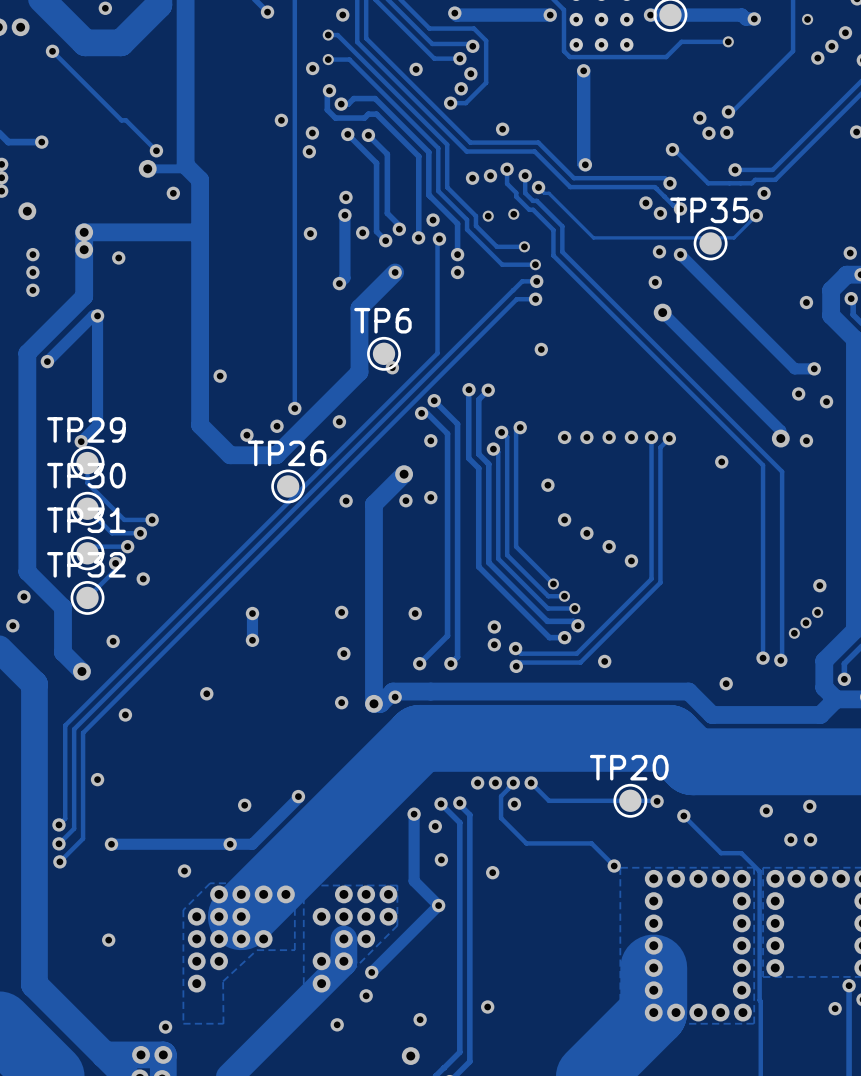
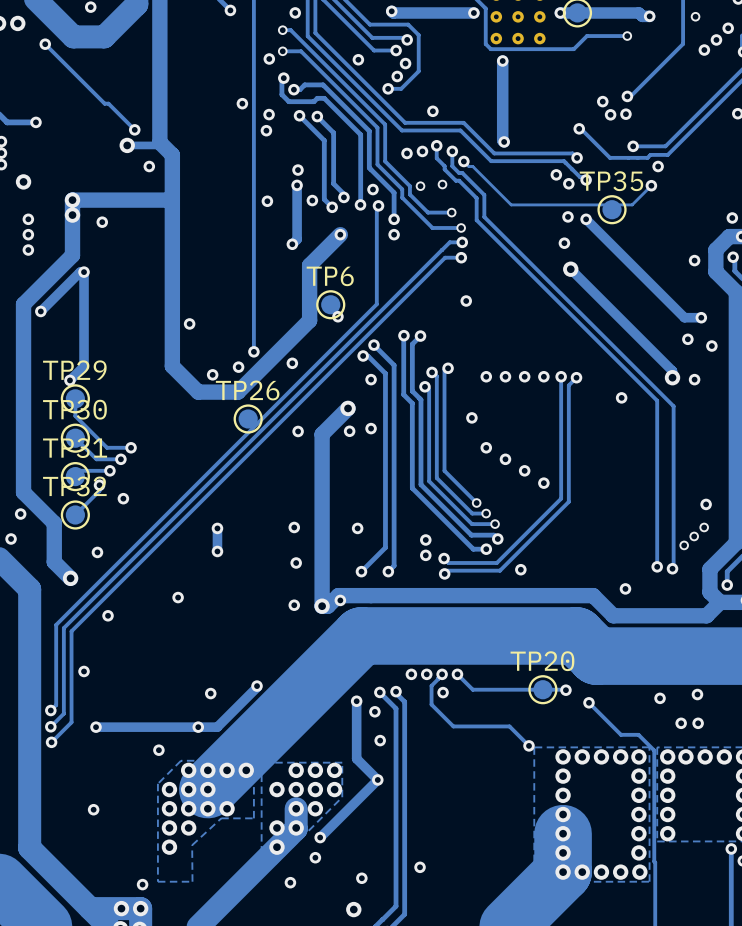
via: (492, 872) -> none
via: (835, 1008) -> none

